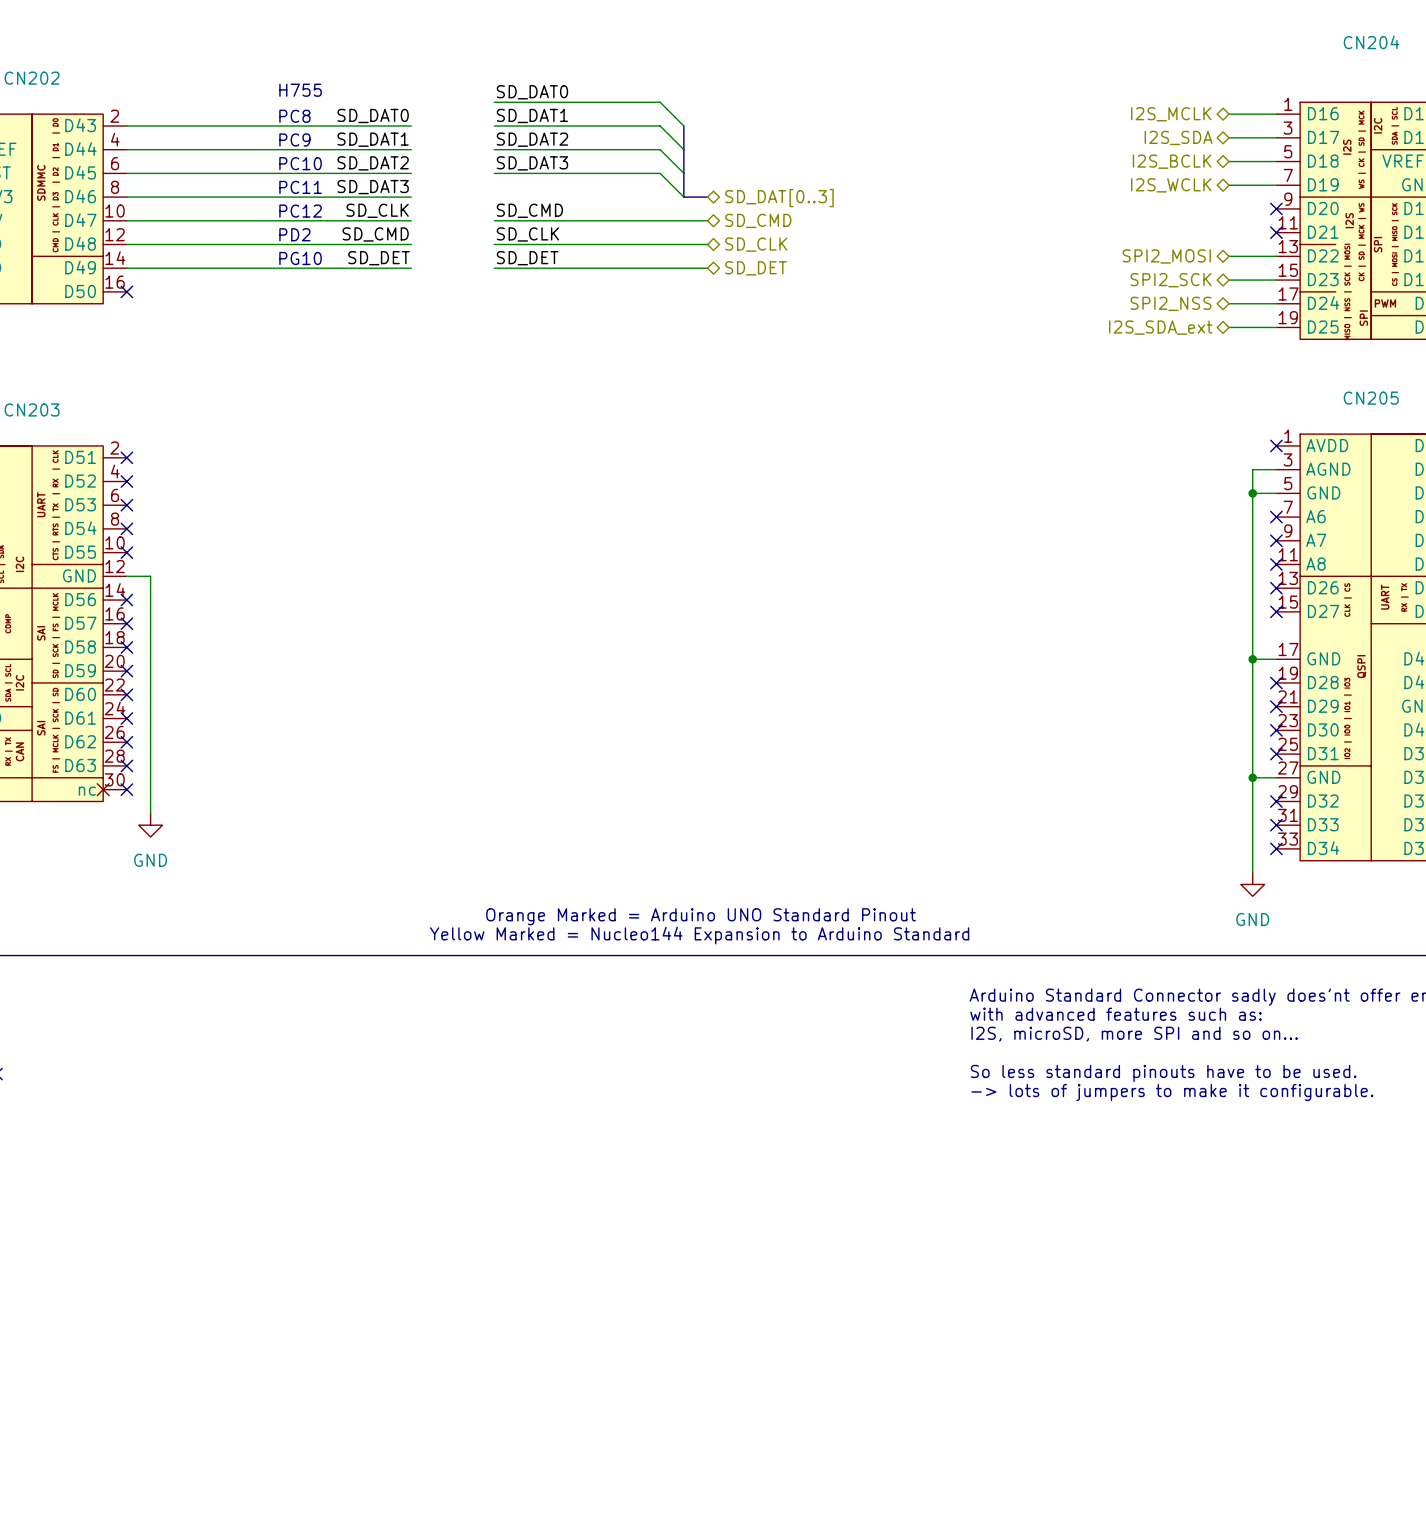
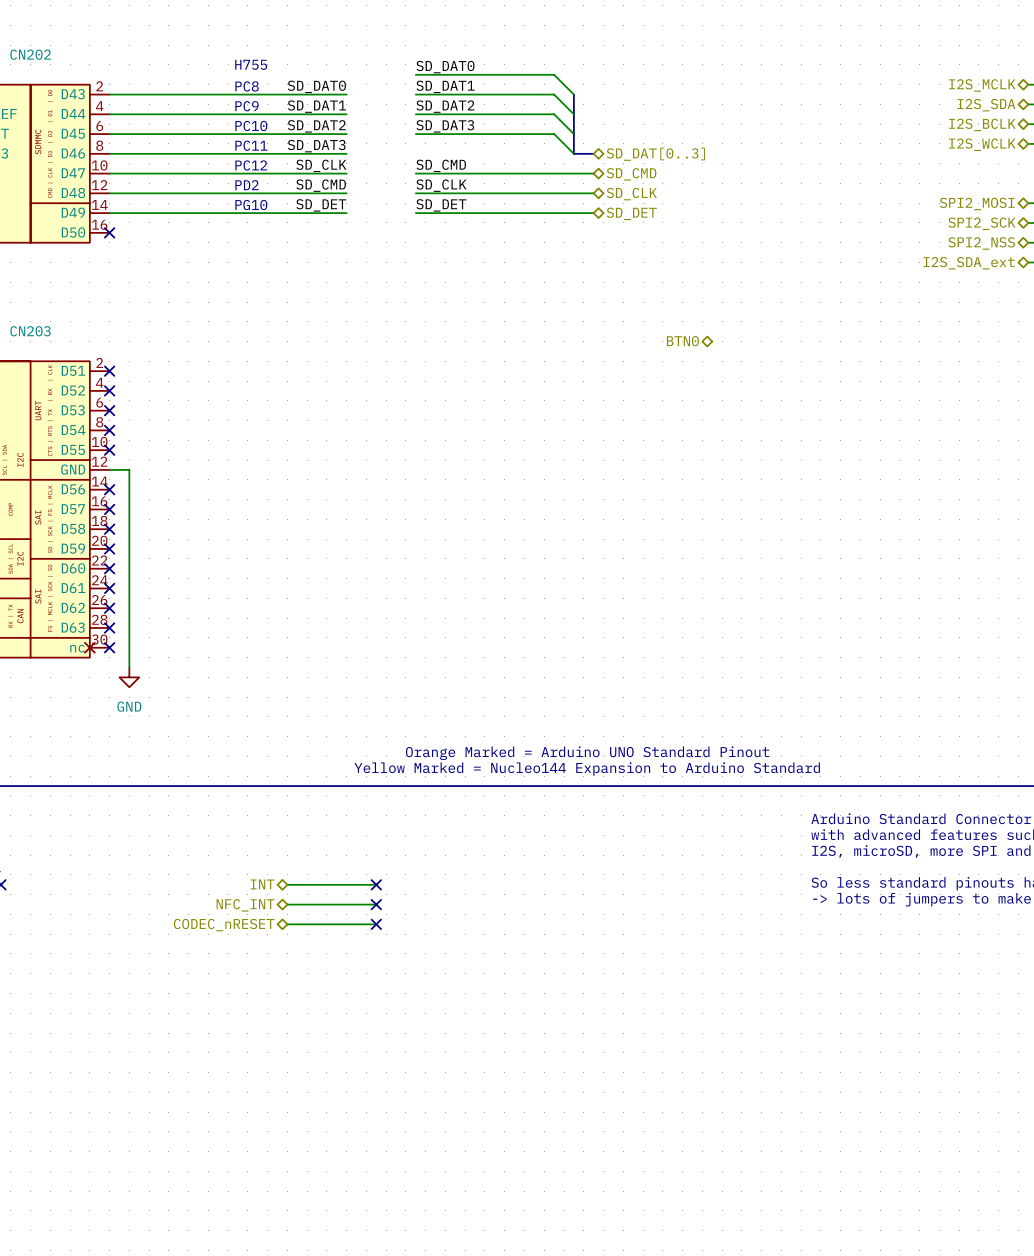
hierarchical label: none -> BTN0 (682, 341)
hierarchical label: none -> INT (262, 884)
wire: none -> (287, 884) (376, 884)
no-connect mark: none -> (376, 884)
hierarchical label: none -> NFC_INT (245, 905)
wire: none -> (287, 904) (376, 904)
no-connect mark: none -> (376, 904)
hierarchical label: none -> CODEC_nRESET (224, 925)
wire: none -> (287, 924) (376, 924)
no-connect mark: none -> (376, 924)

